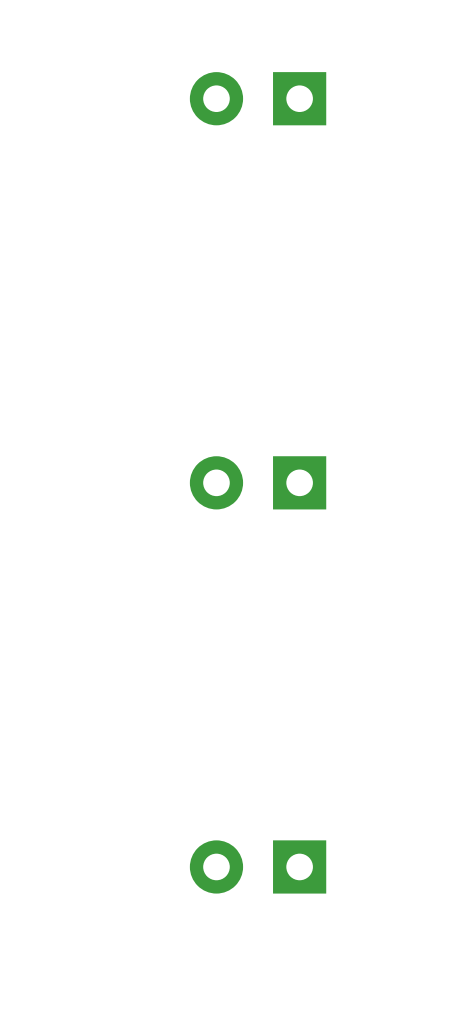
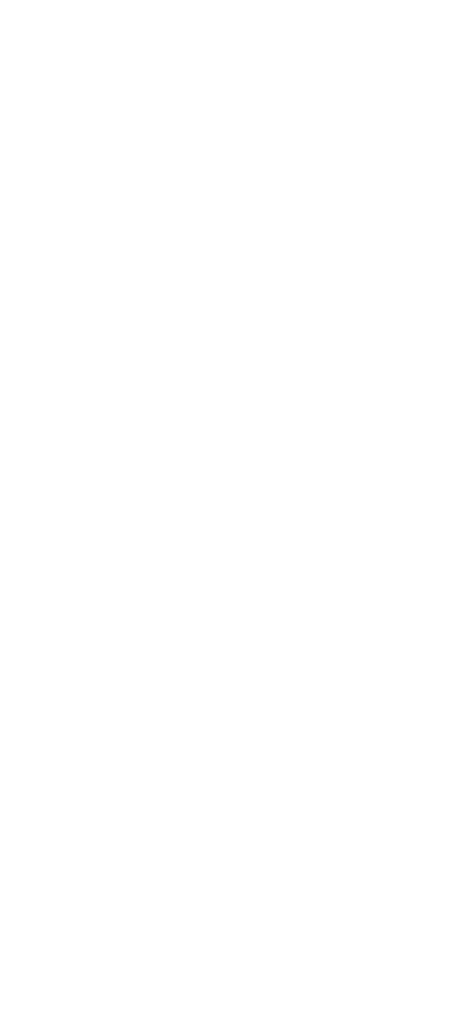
part: (258, 98) -> none
part: (258, 482) -> none
part: (258, 866) -> none

